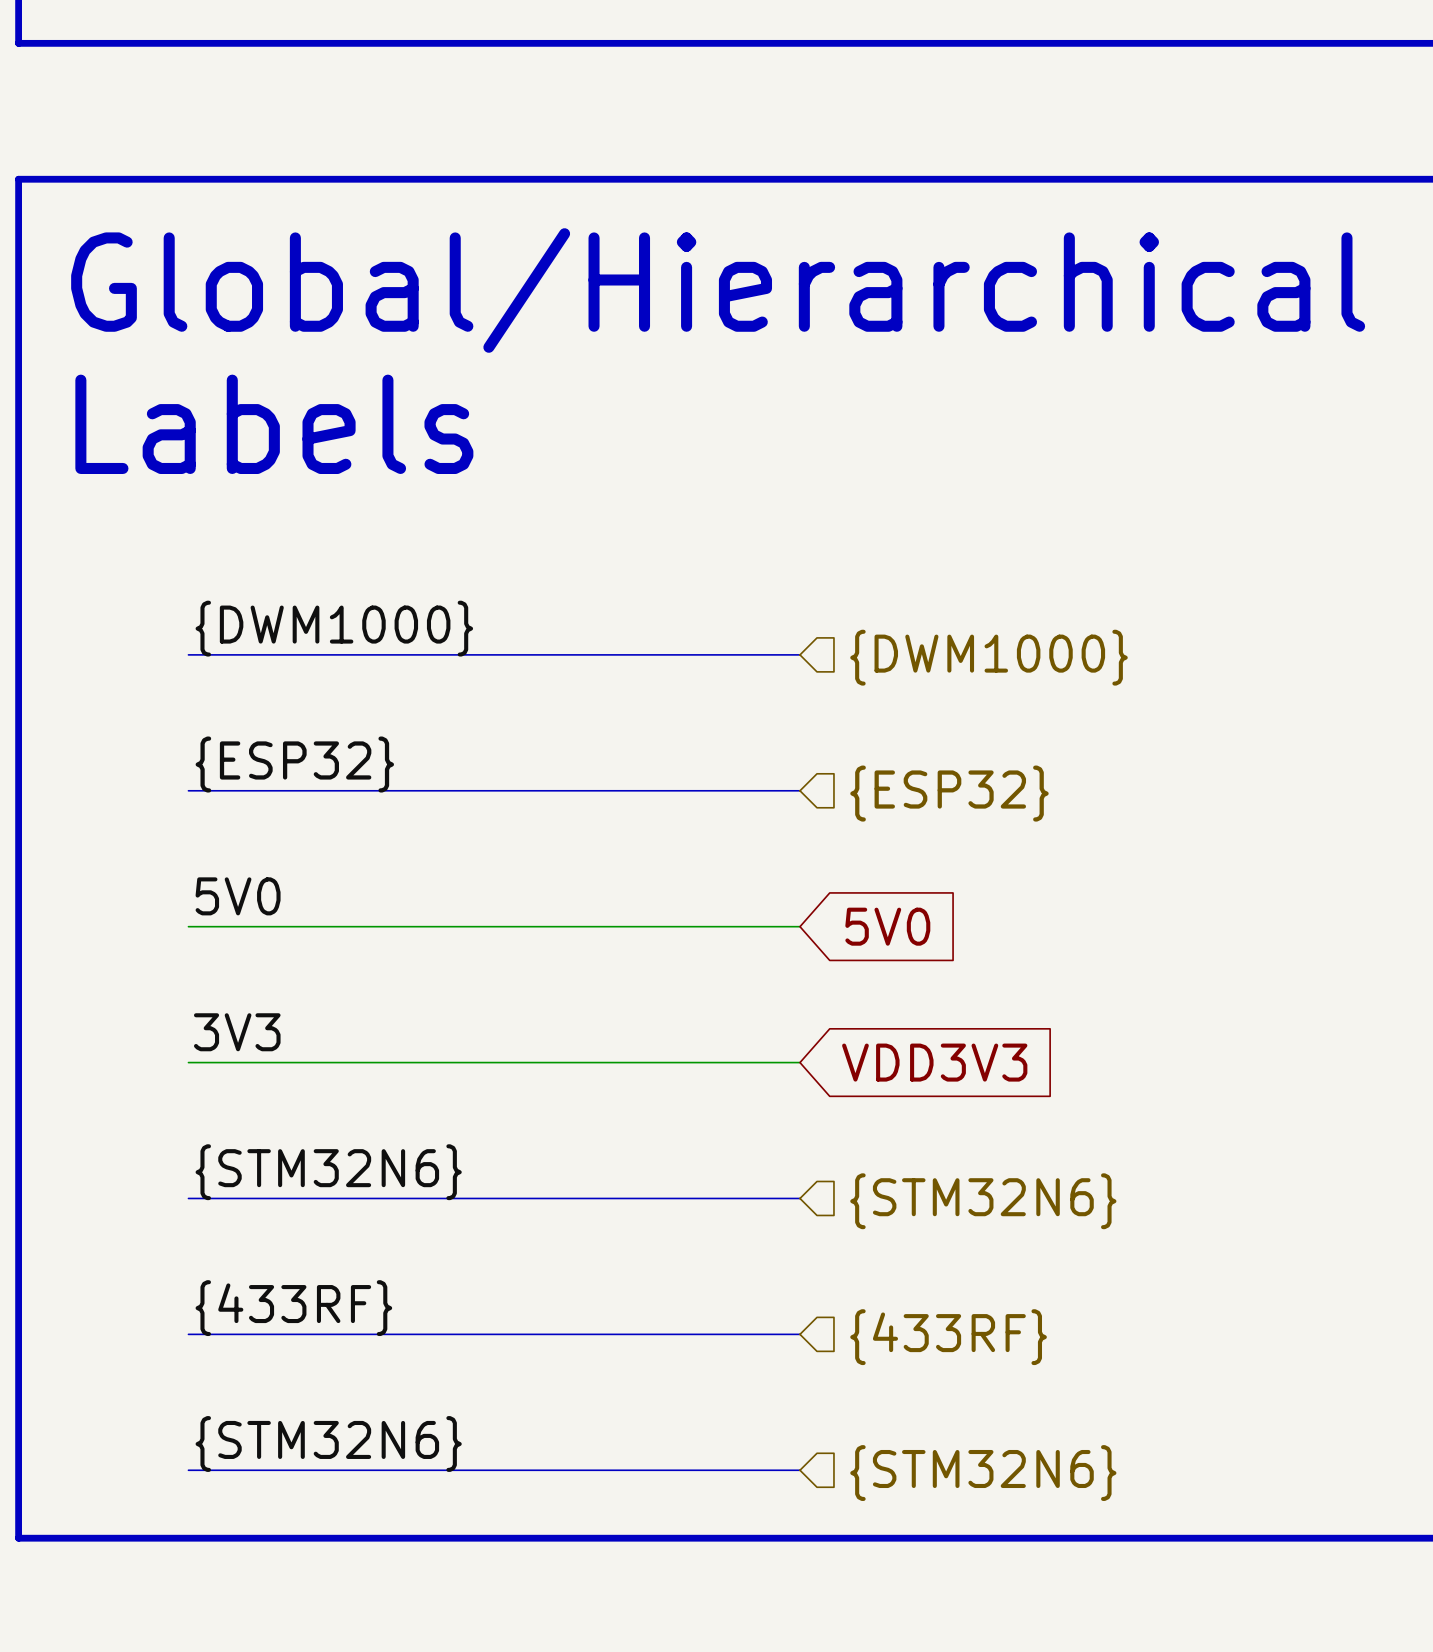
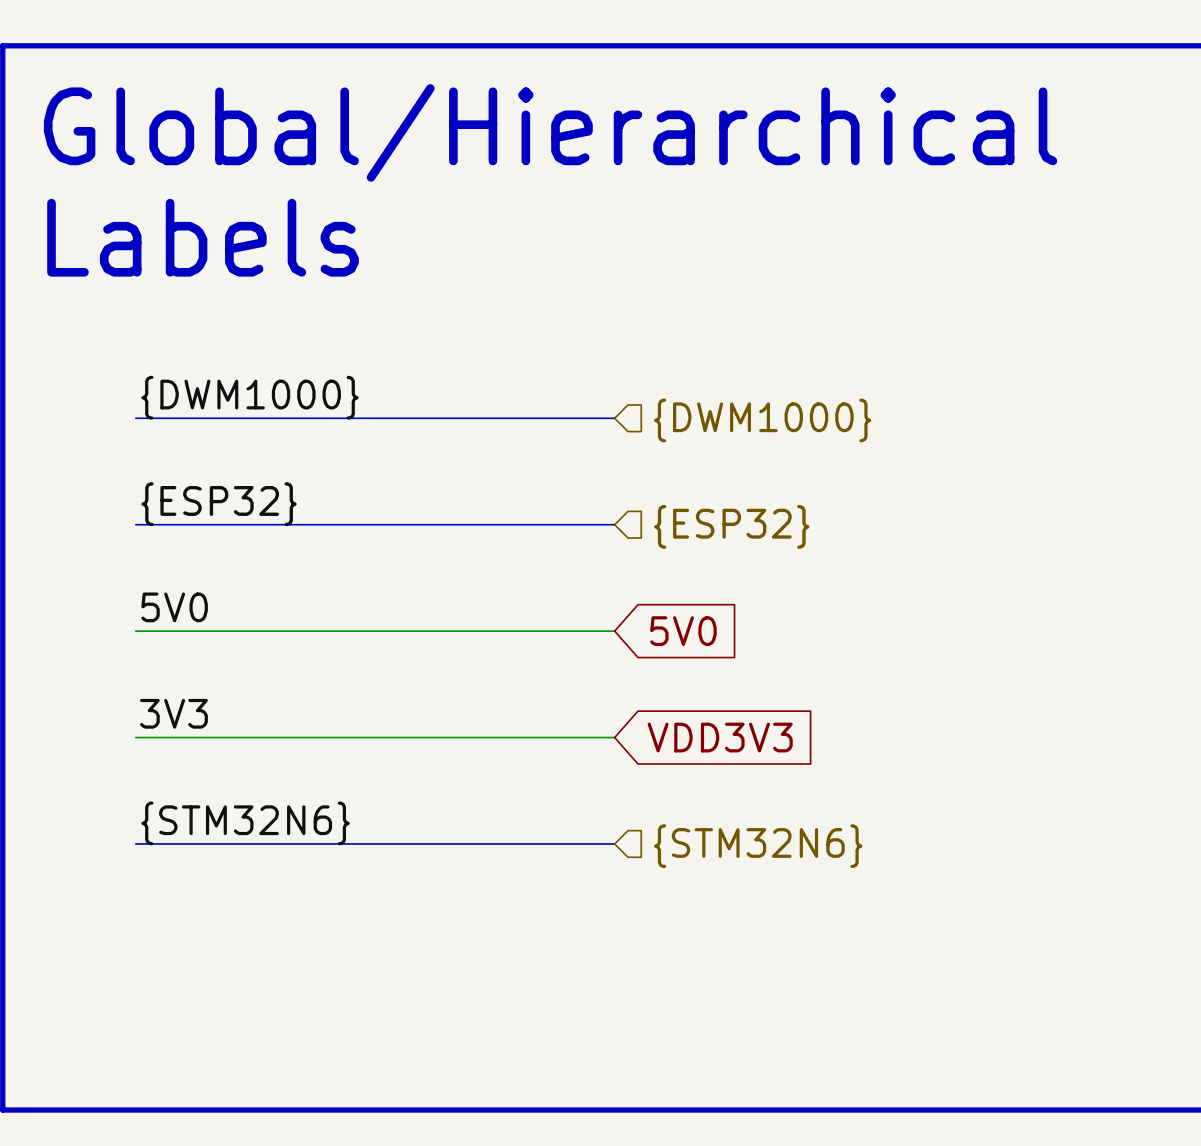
label: {433RF} (293, 1308) -> none
bus: (188, 1334) (800, 1334) -> none
hierarchical label: {433RF} (948, 1337) -> none
label: {STM32N6} (328, 1443) -> none
bus: (188, 1470) (800, 1470) -> none
hierarchical label: {STM32N6} (983, 1473) -> none

